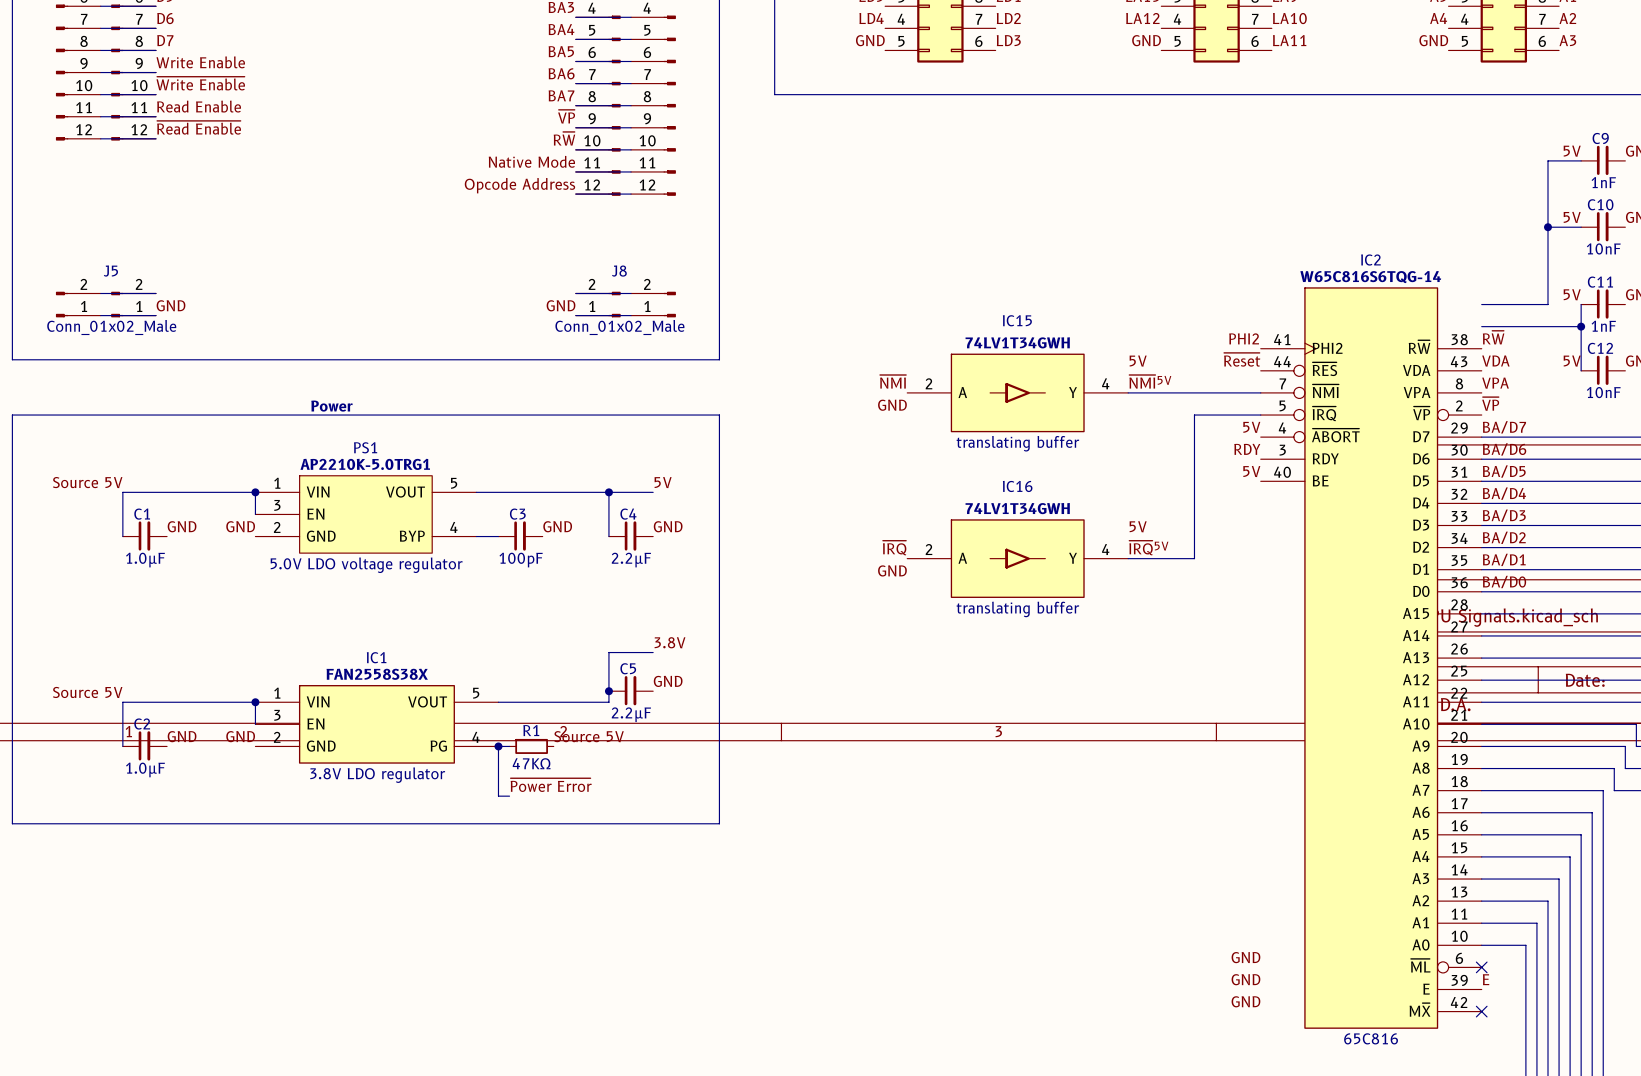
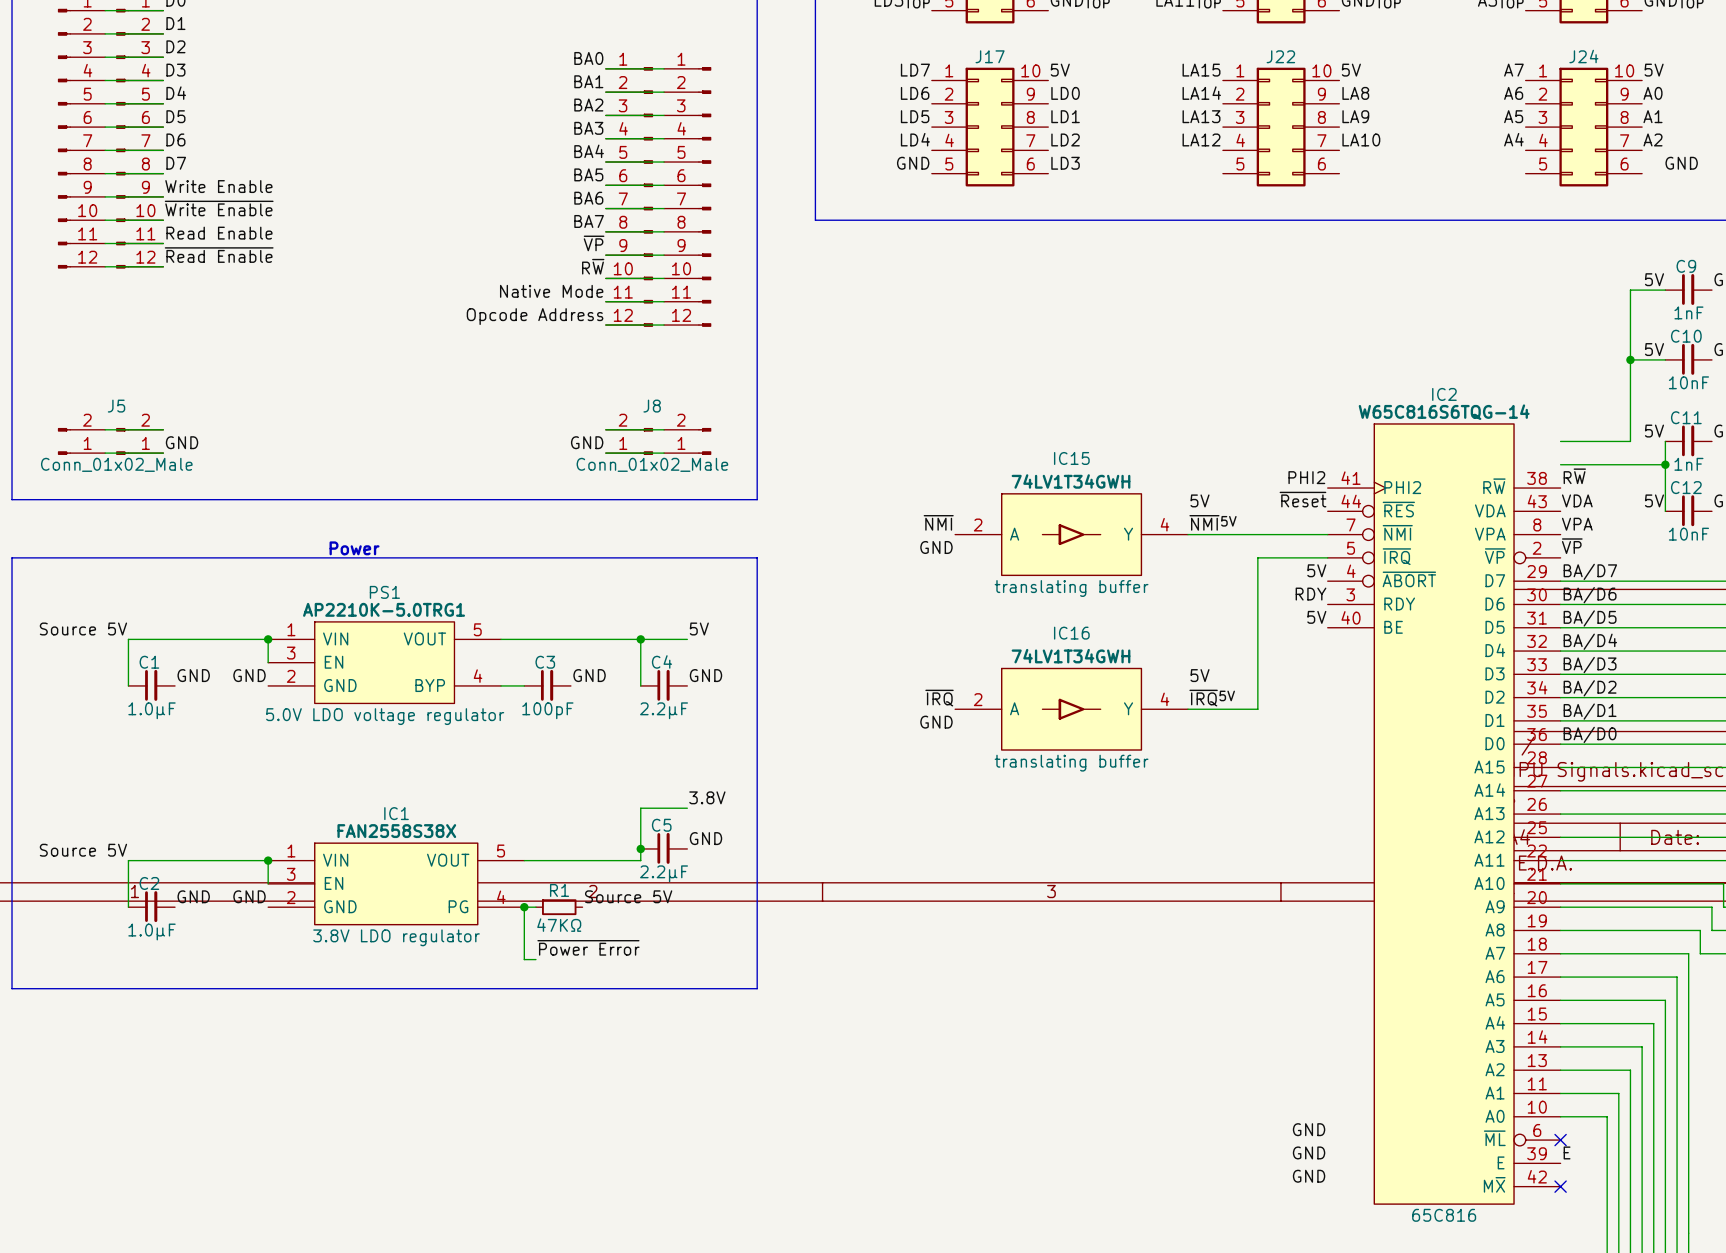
label: GND (1146, 40) -> none
label: LA11 (1289, 40) -> none
label position: GND (1433, 40) -> GND (1681, 163)
label: A3 (1567, 40) -> none

